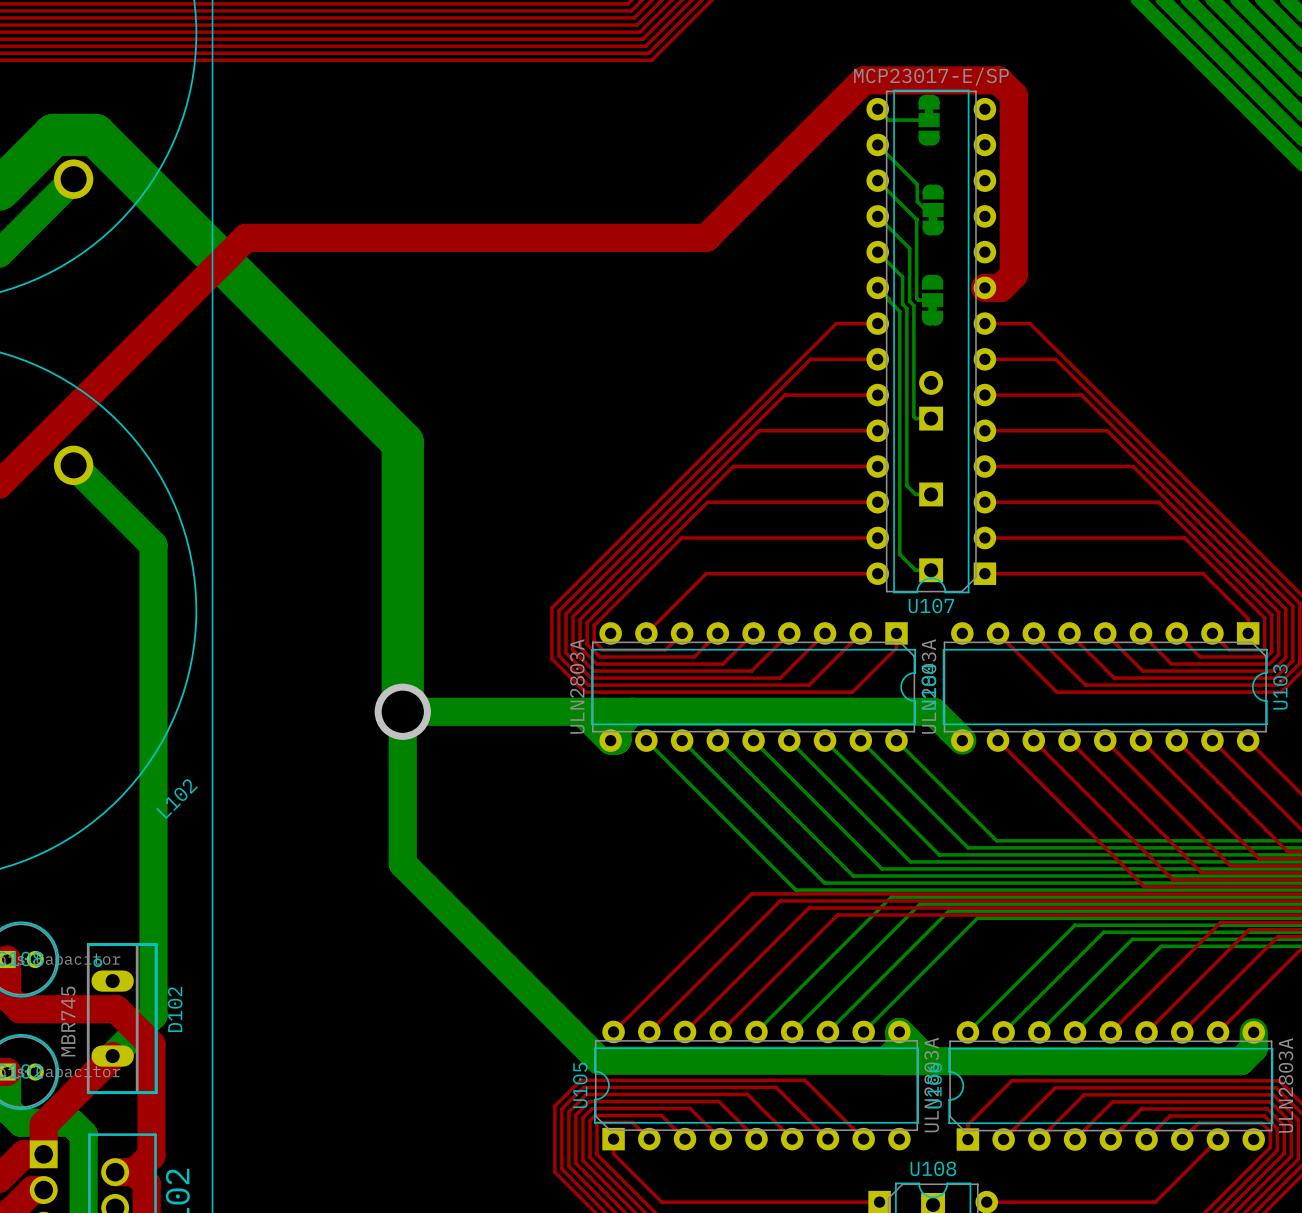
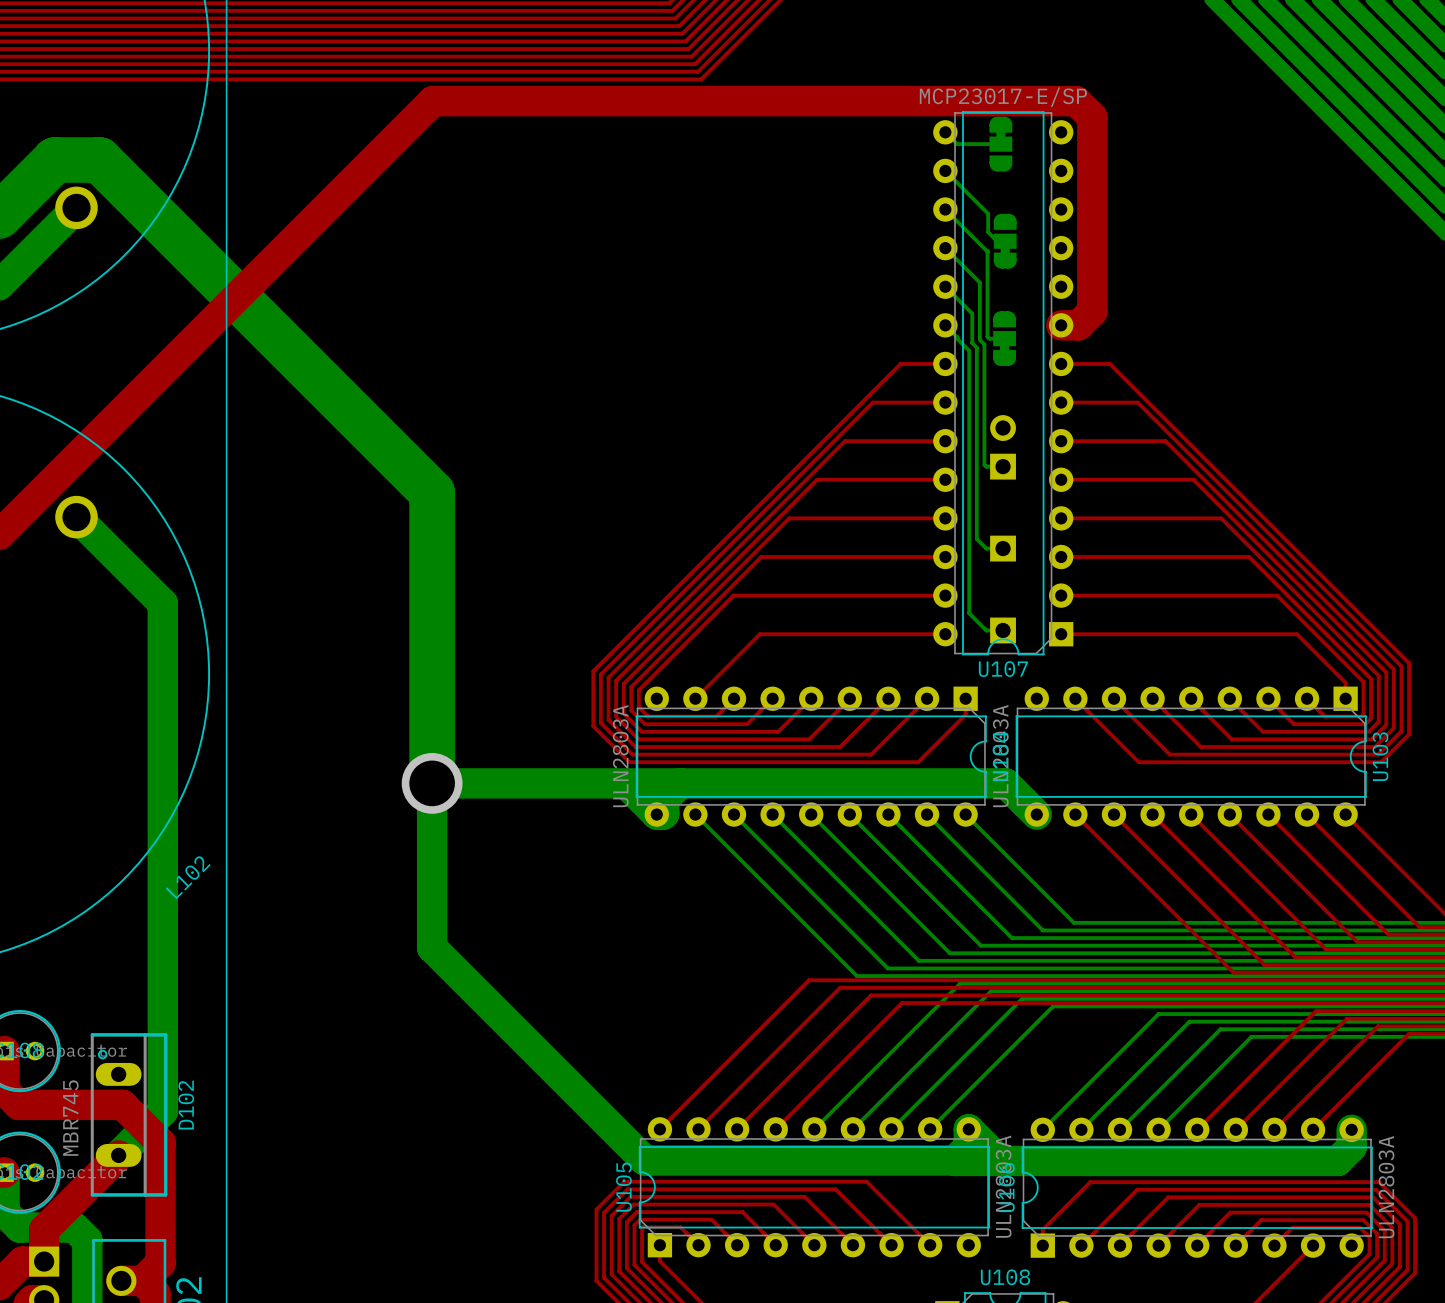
top track: (863, 80) (706, 237) (245, 237) -> (930, 101) (432, 101) (262, 271)

